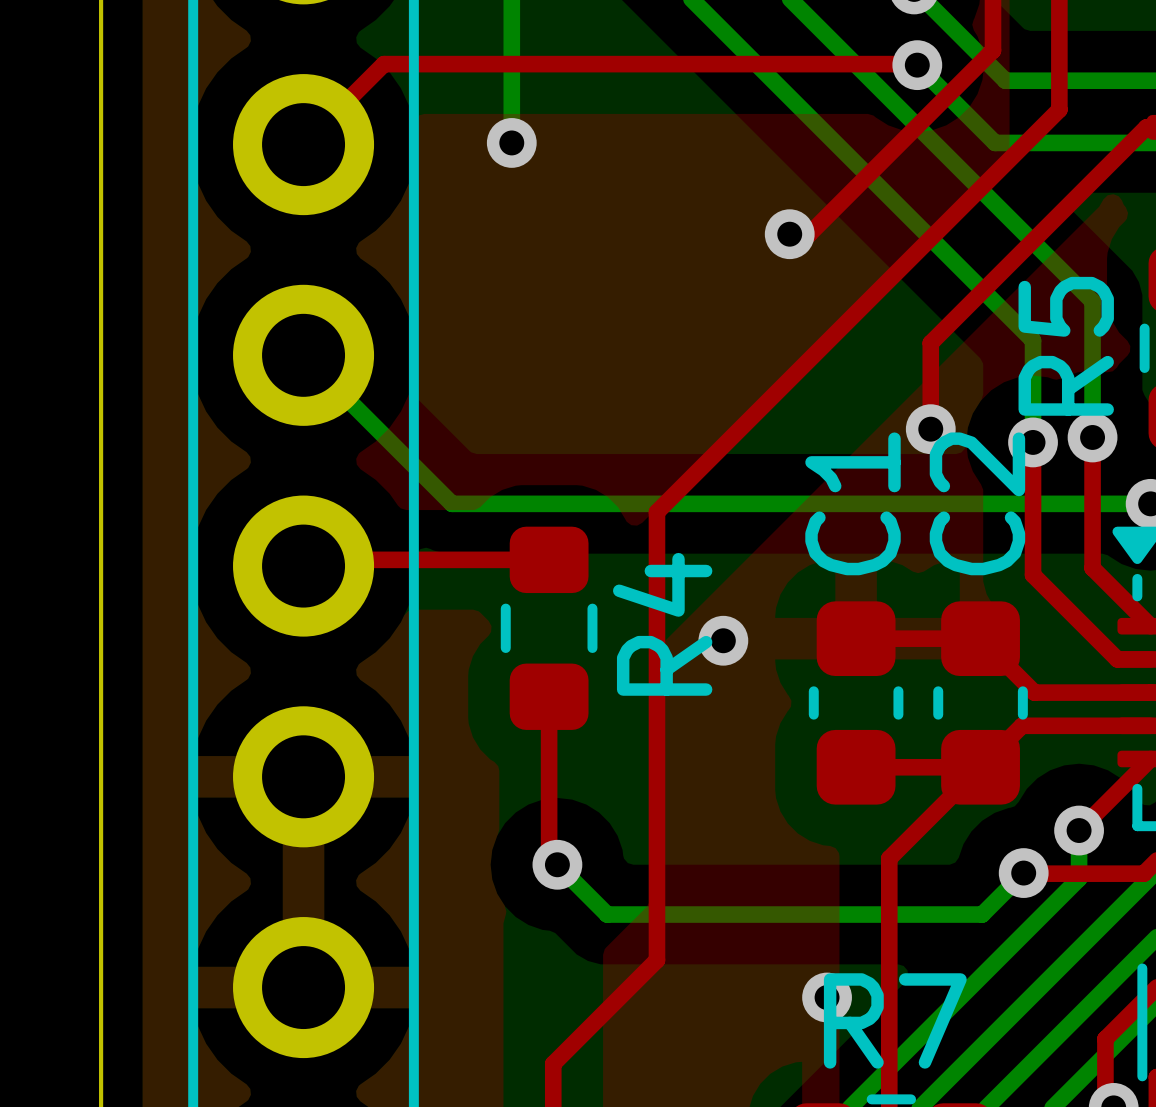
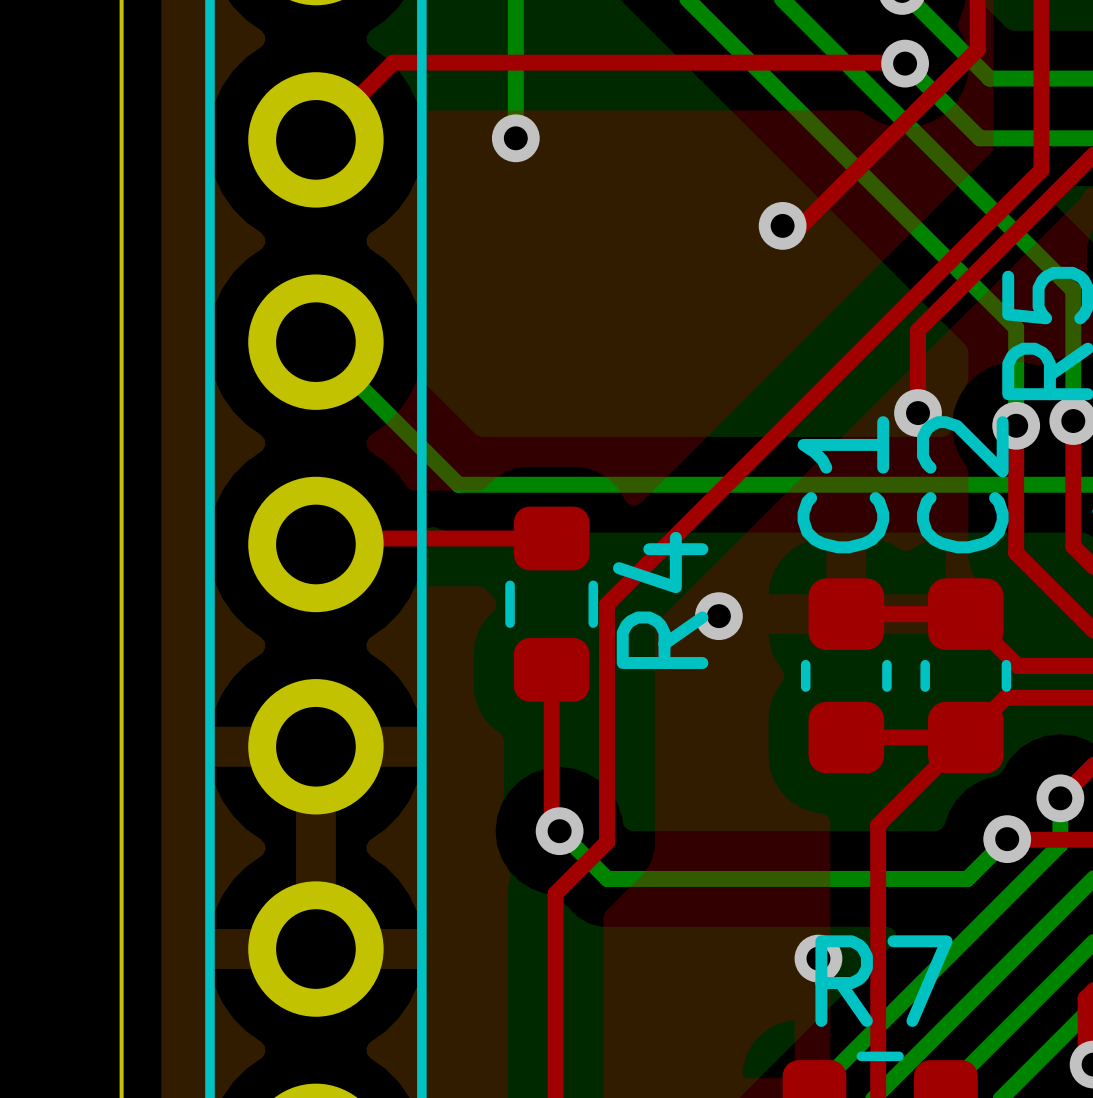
top track: (1059, 109) (656, 512) (656, 960) (553, 1063) -> (1041, 106) (1041, 170) (607, 604) (607, 842) (555, 893) (555, 1022)

